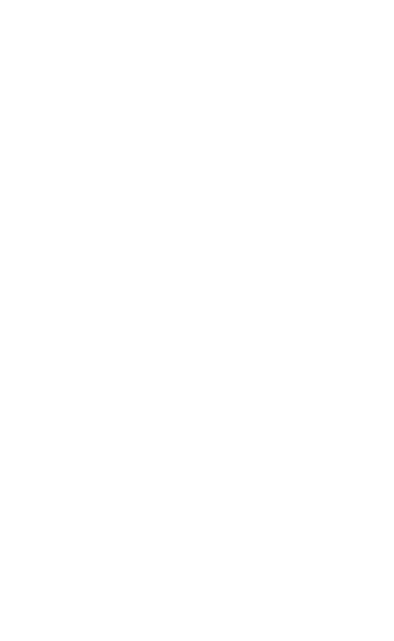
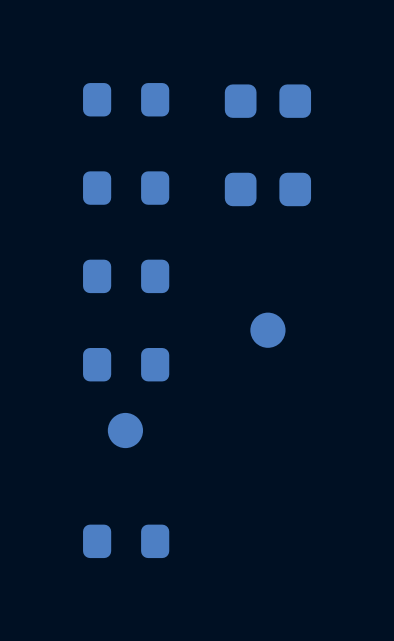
part: none -> (126, 99)
part: none -> (267, 101)
part: none -> (126, 188)
part: none -> (267, 189)
part: none -> (126, 276)
part: none -> (267, 330)
part: none -> (126, 364)
part: none -> (125, 430)
part: none -> (126, 541)

